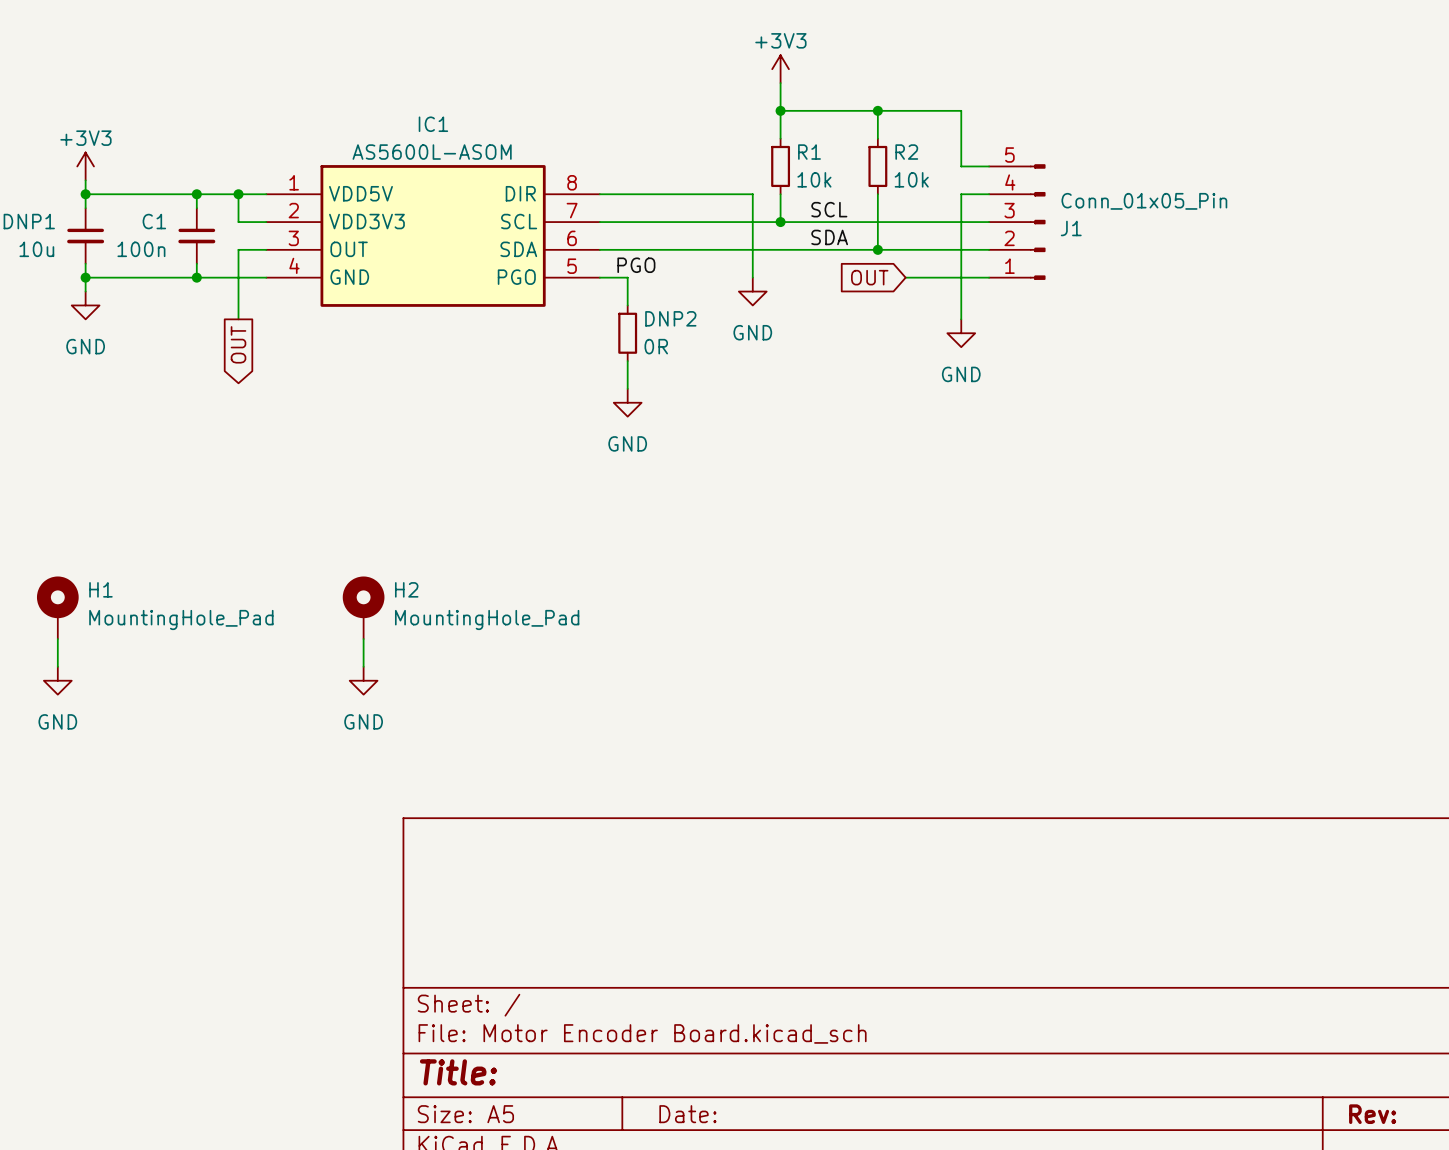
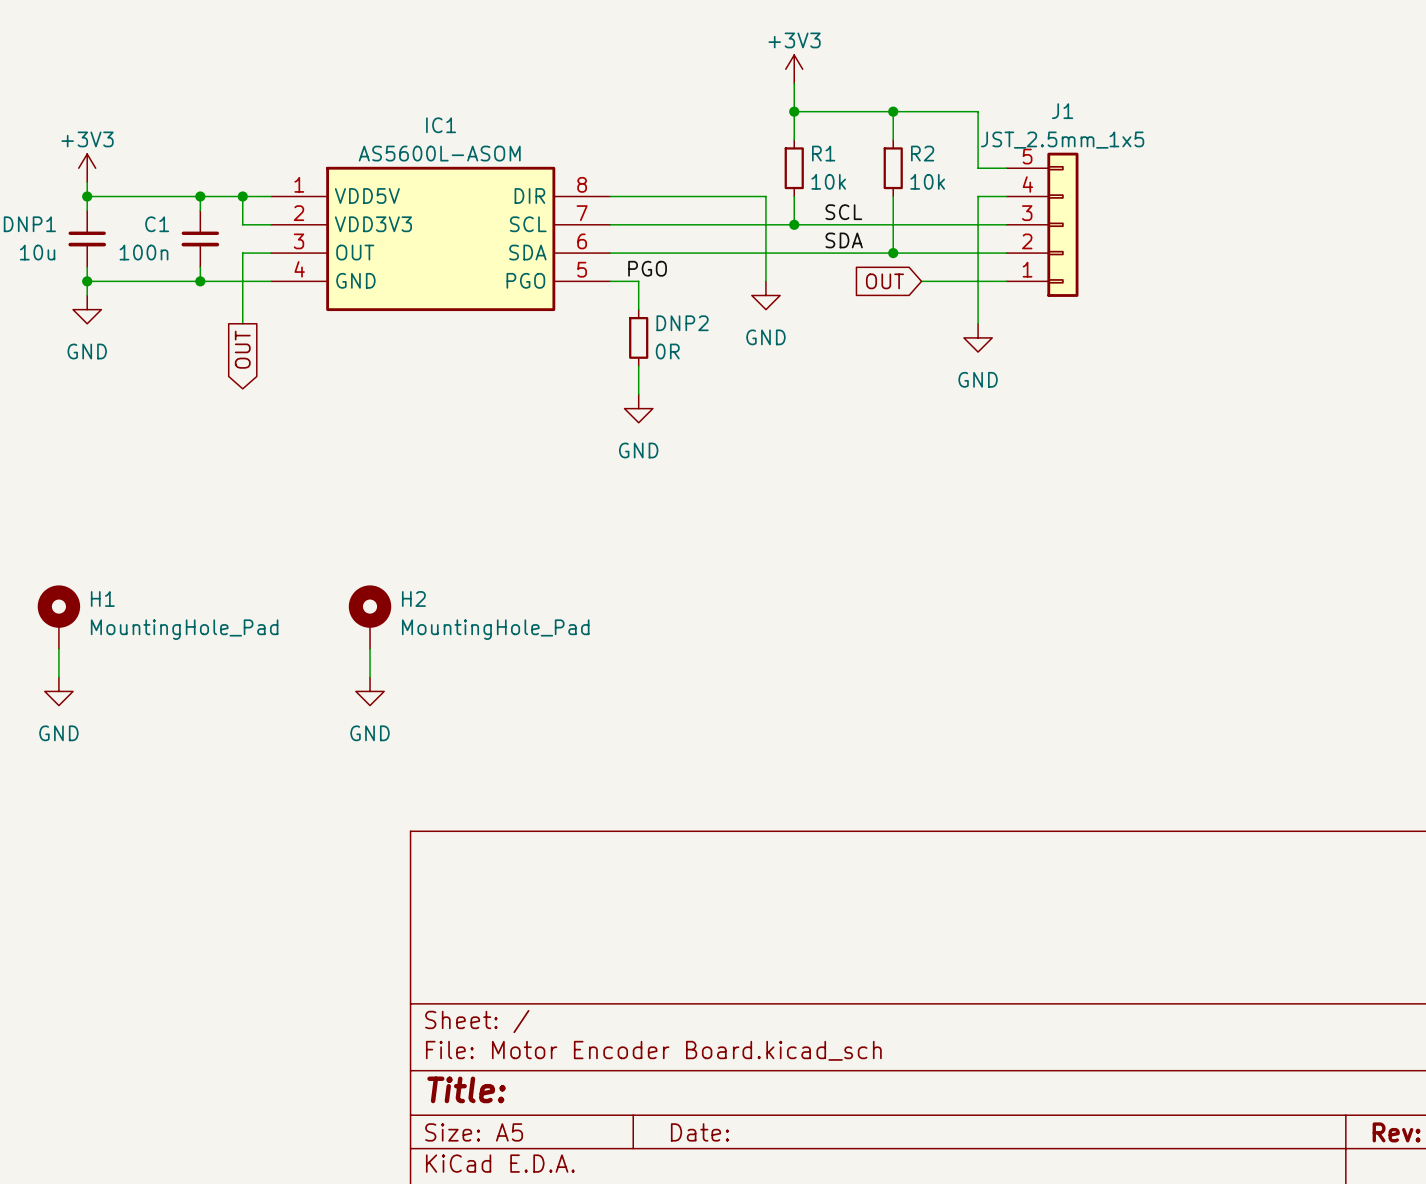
J1 symbol: [989, 164, 1046, 280] -> [1006, 152, 1079, 297]
J1 value: Conn_01x05_Pin (1144, 201) -> JST_2.5mm_1x5 (1062, 140)
J1 name position: J1 (1071, 228) -> J1 (1062, 111)

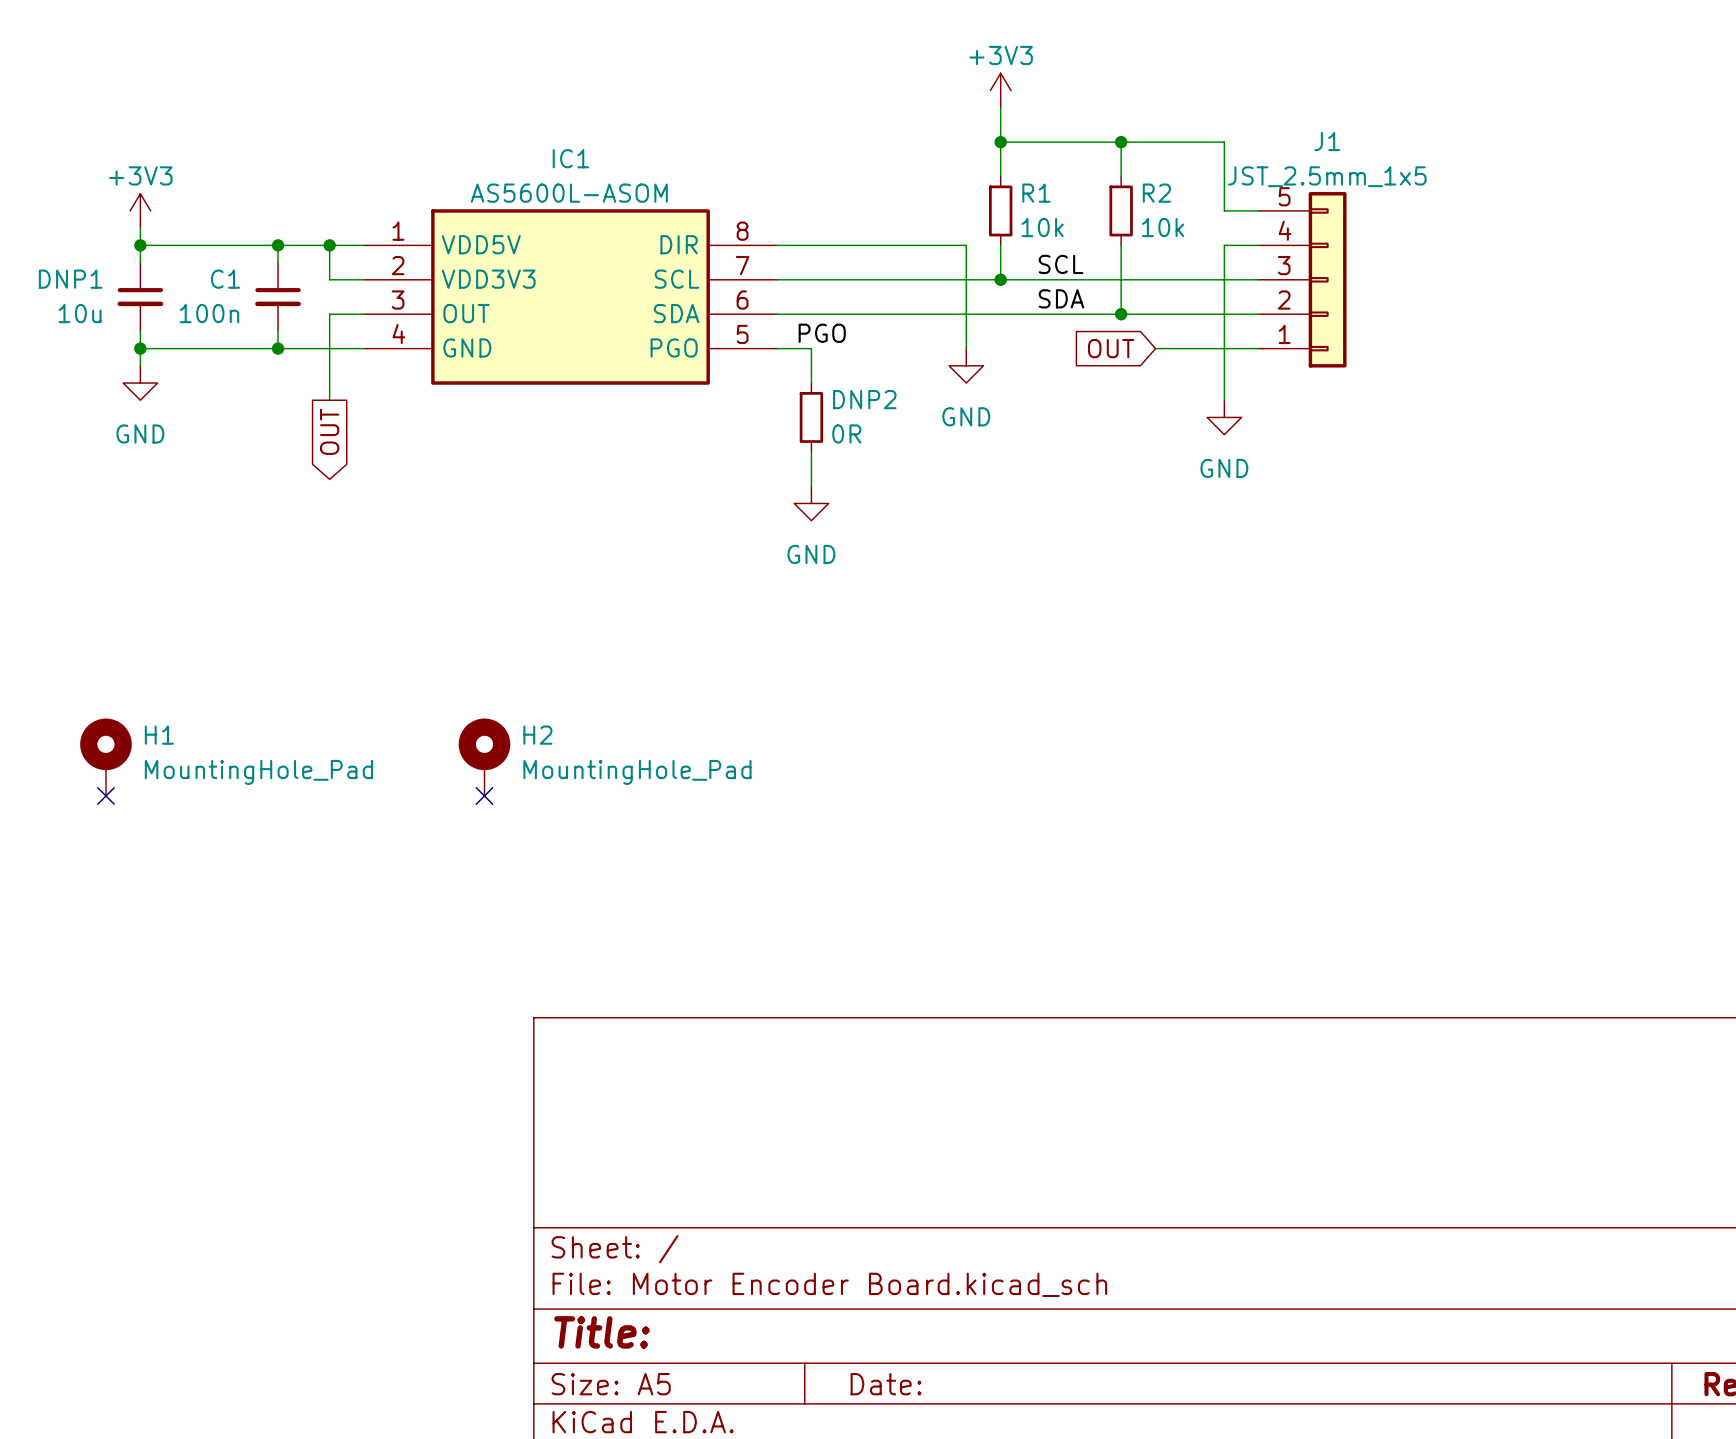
wire: (58, 649) (58, 677) -> none
no-connect mark: none -> (105, 795)
wire: (370, 649) (370, 677) -> none
no-connect mark: none -> (484, 795)
power symbol: GND (58, 691) -> none
power symbol: GND (370, 691) -> none

